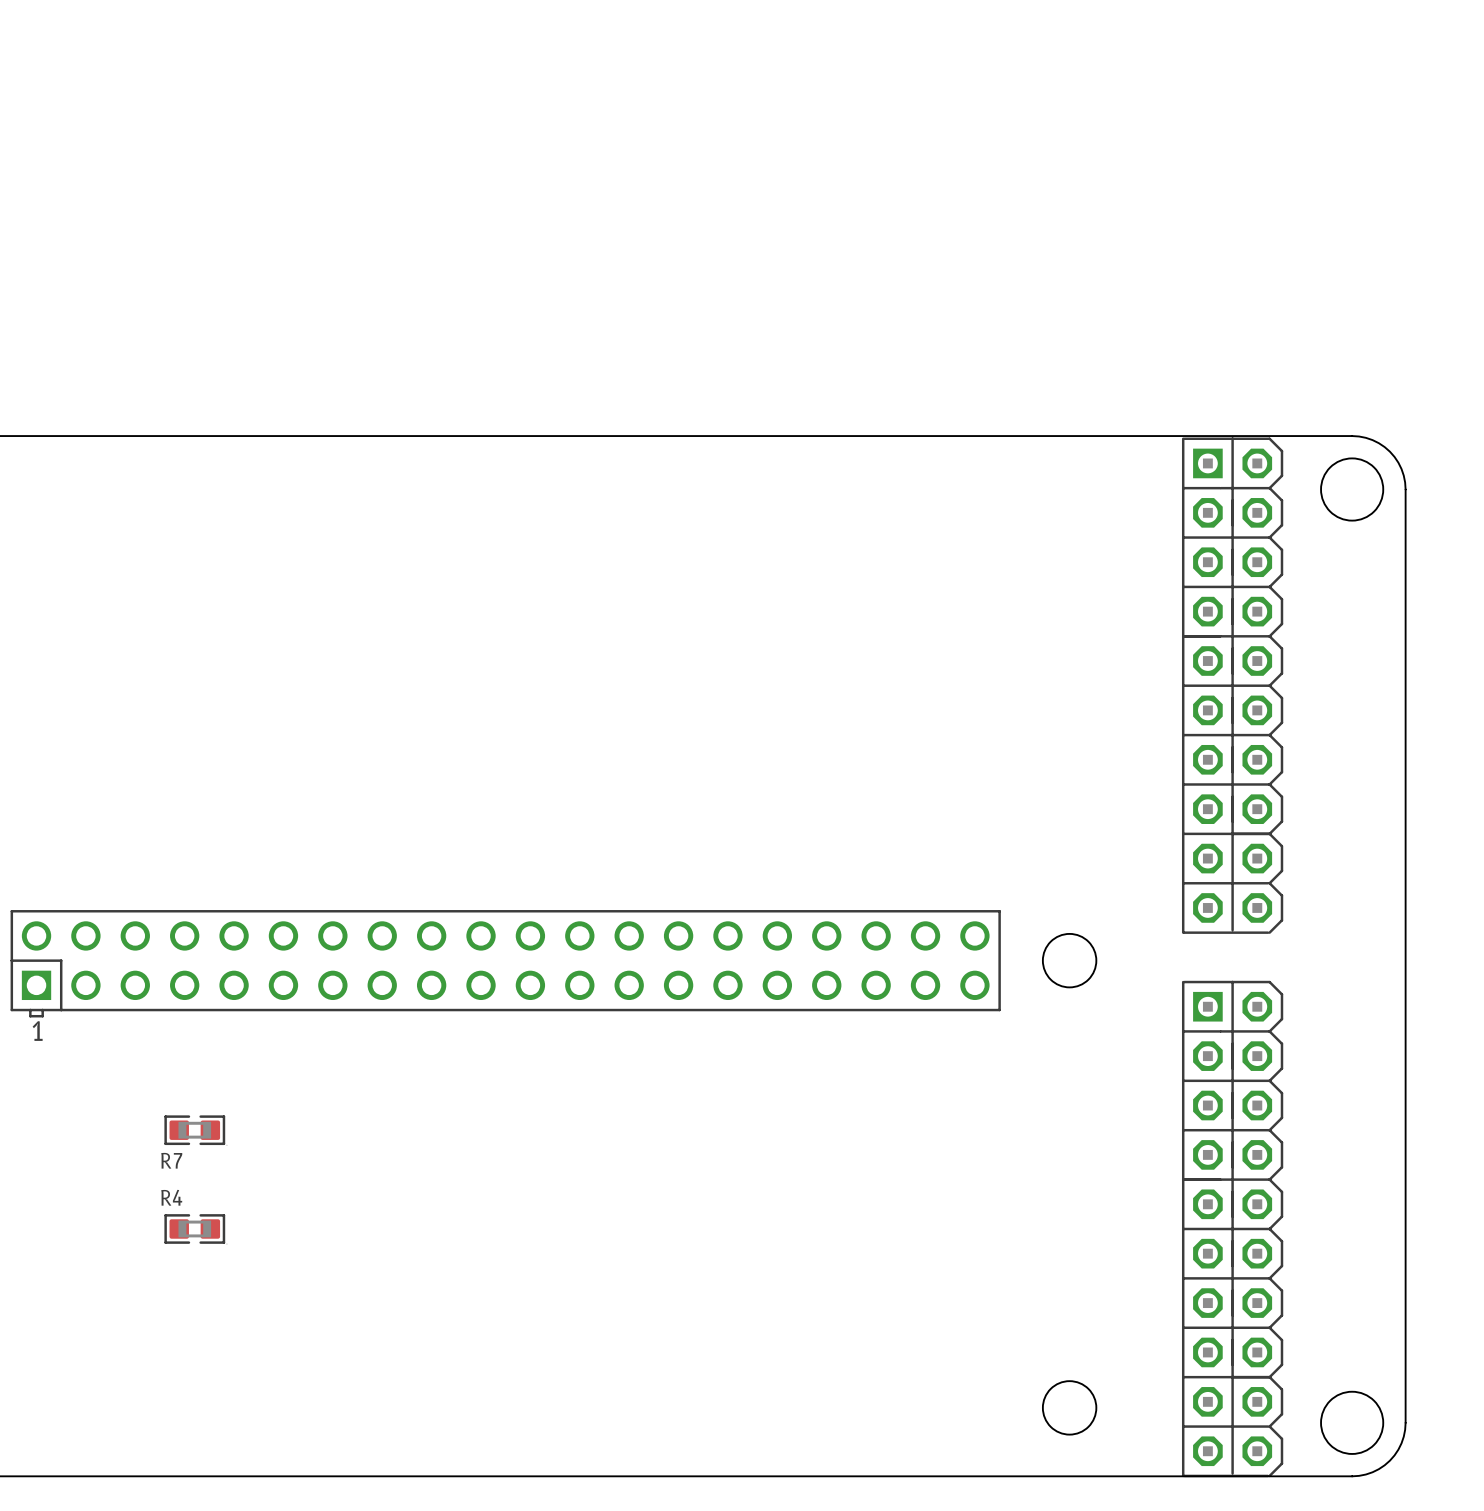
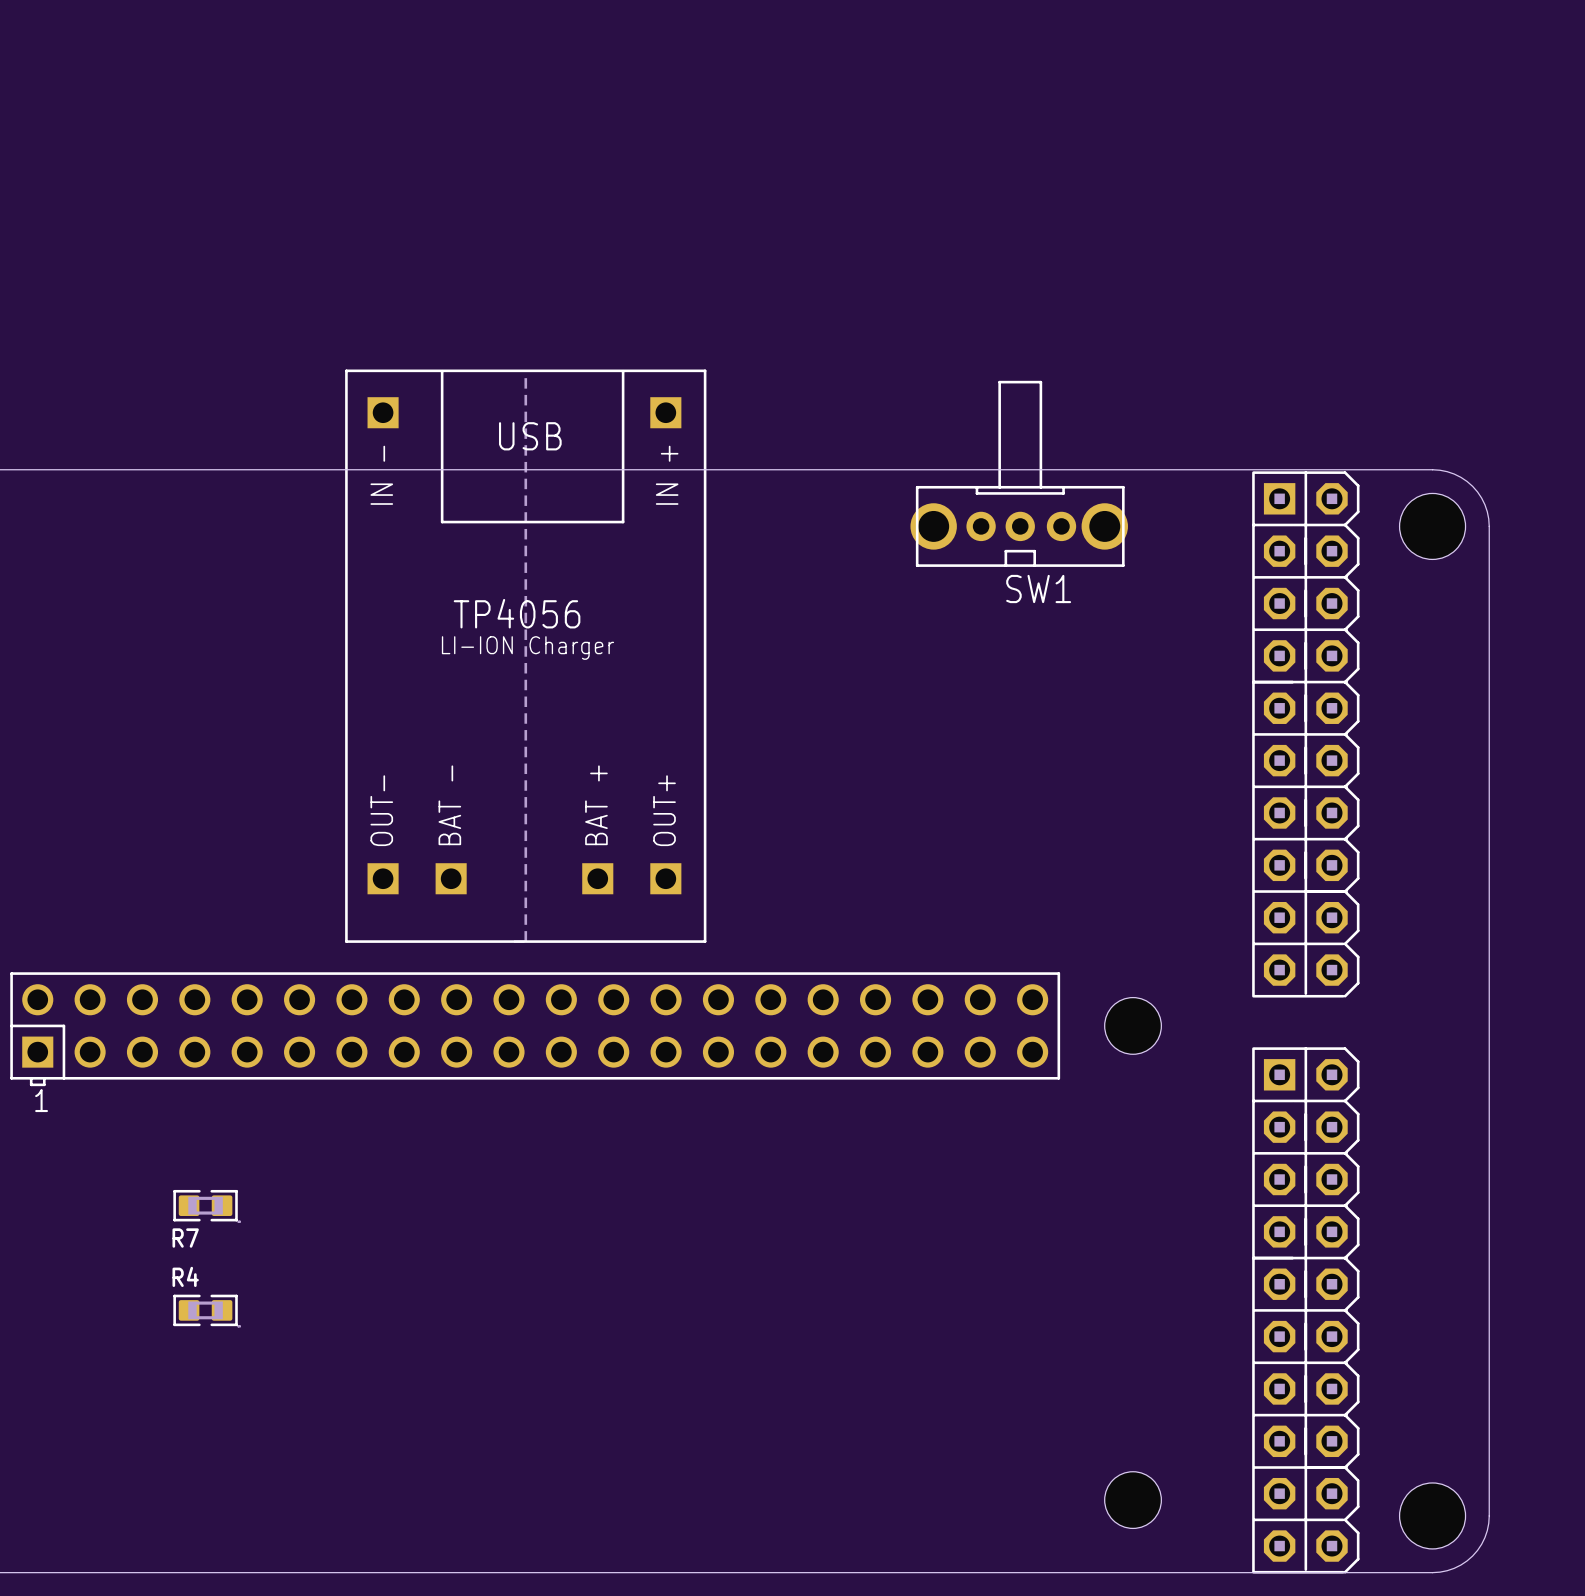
SW1: none -> (1019, 473)
part: none -> (525, 656)

